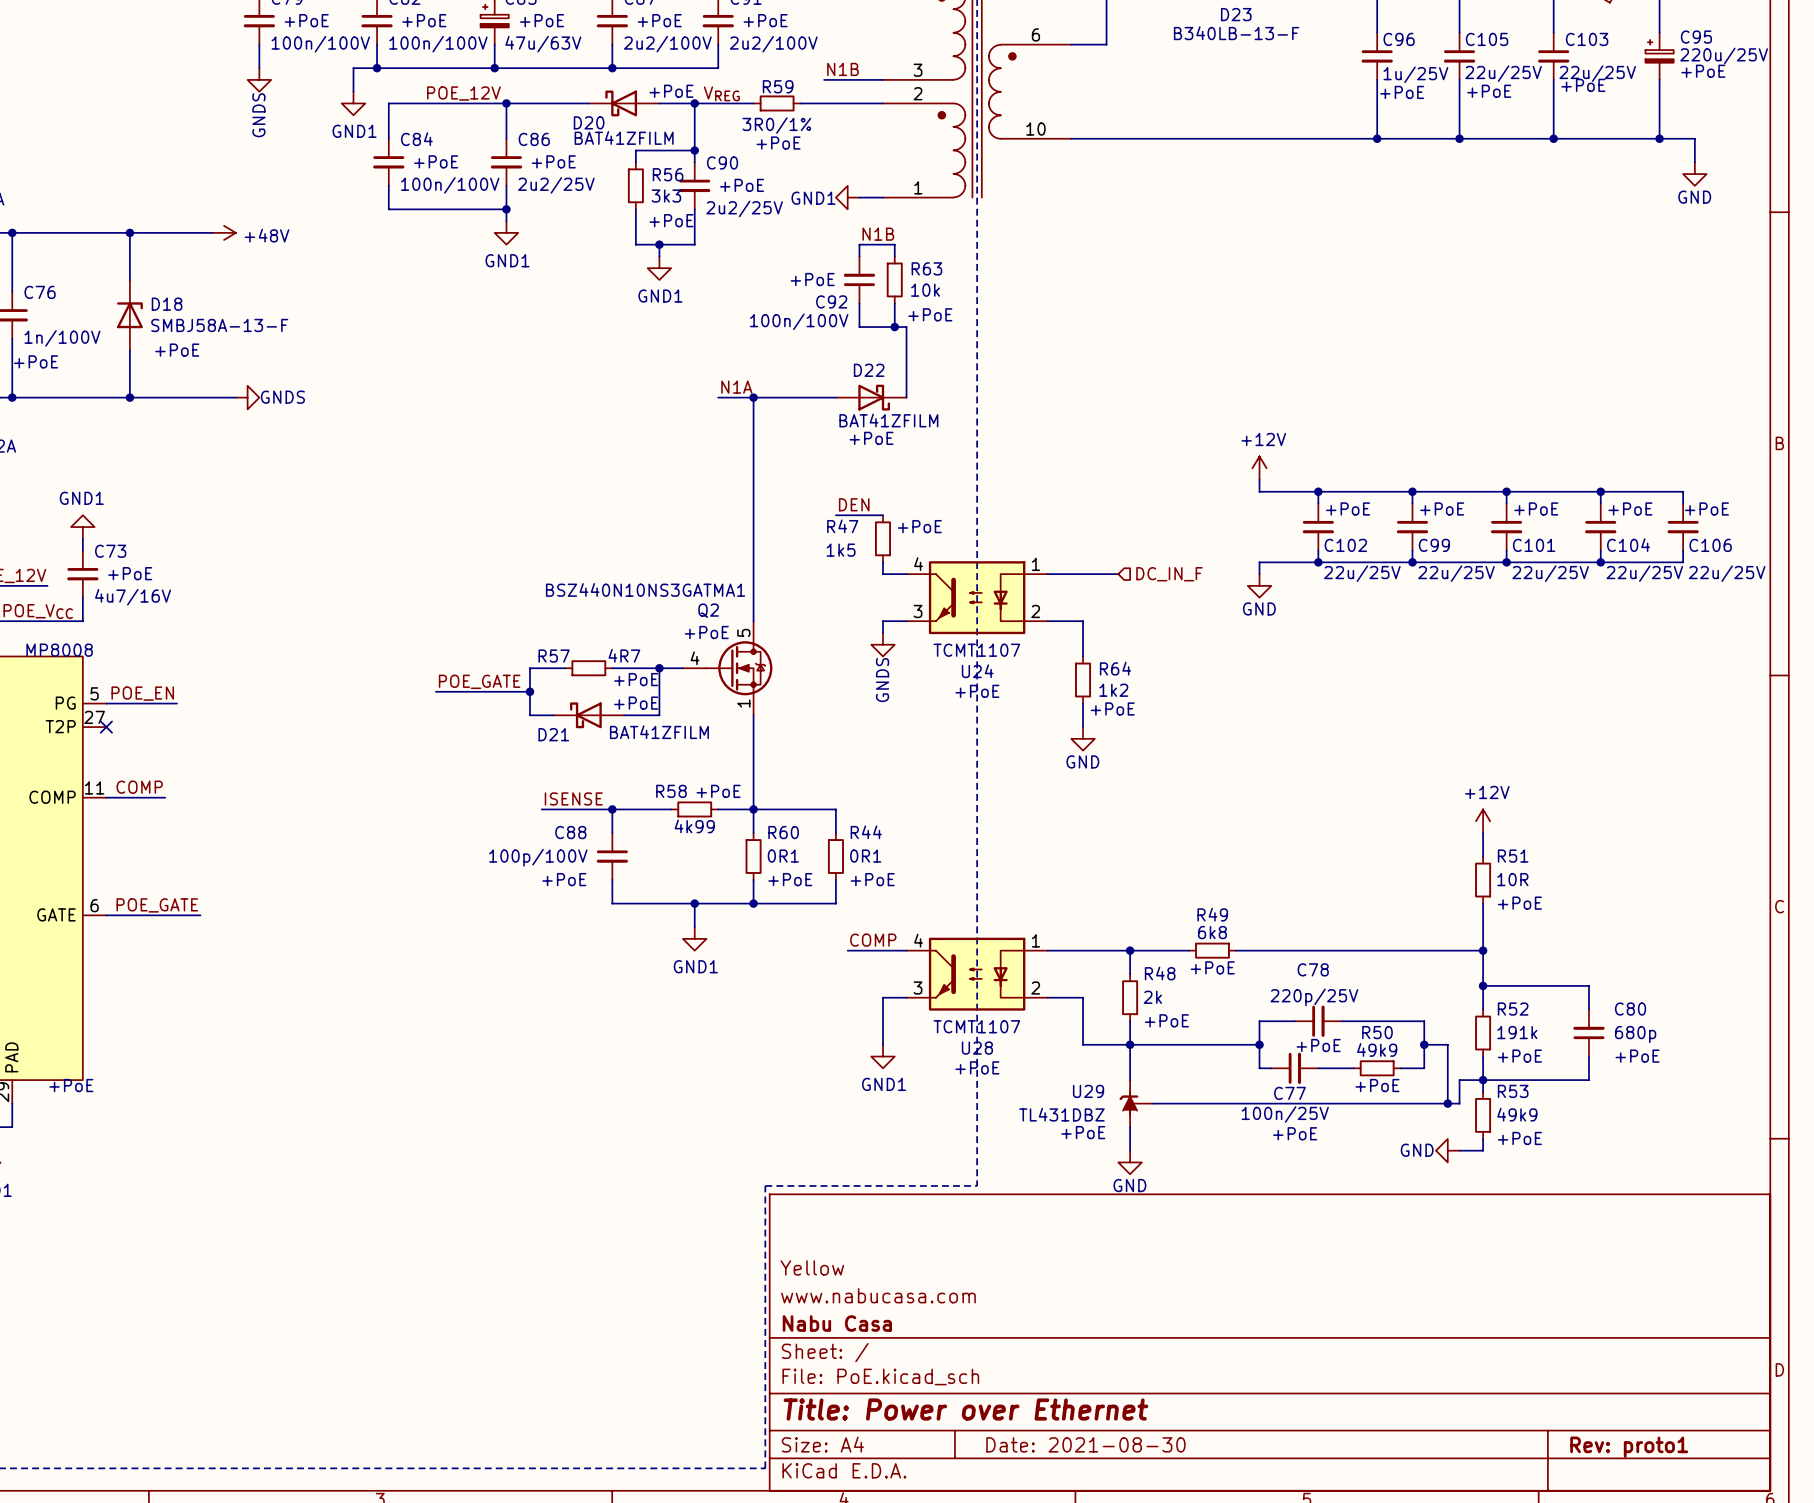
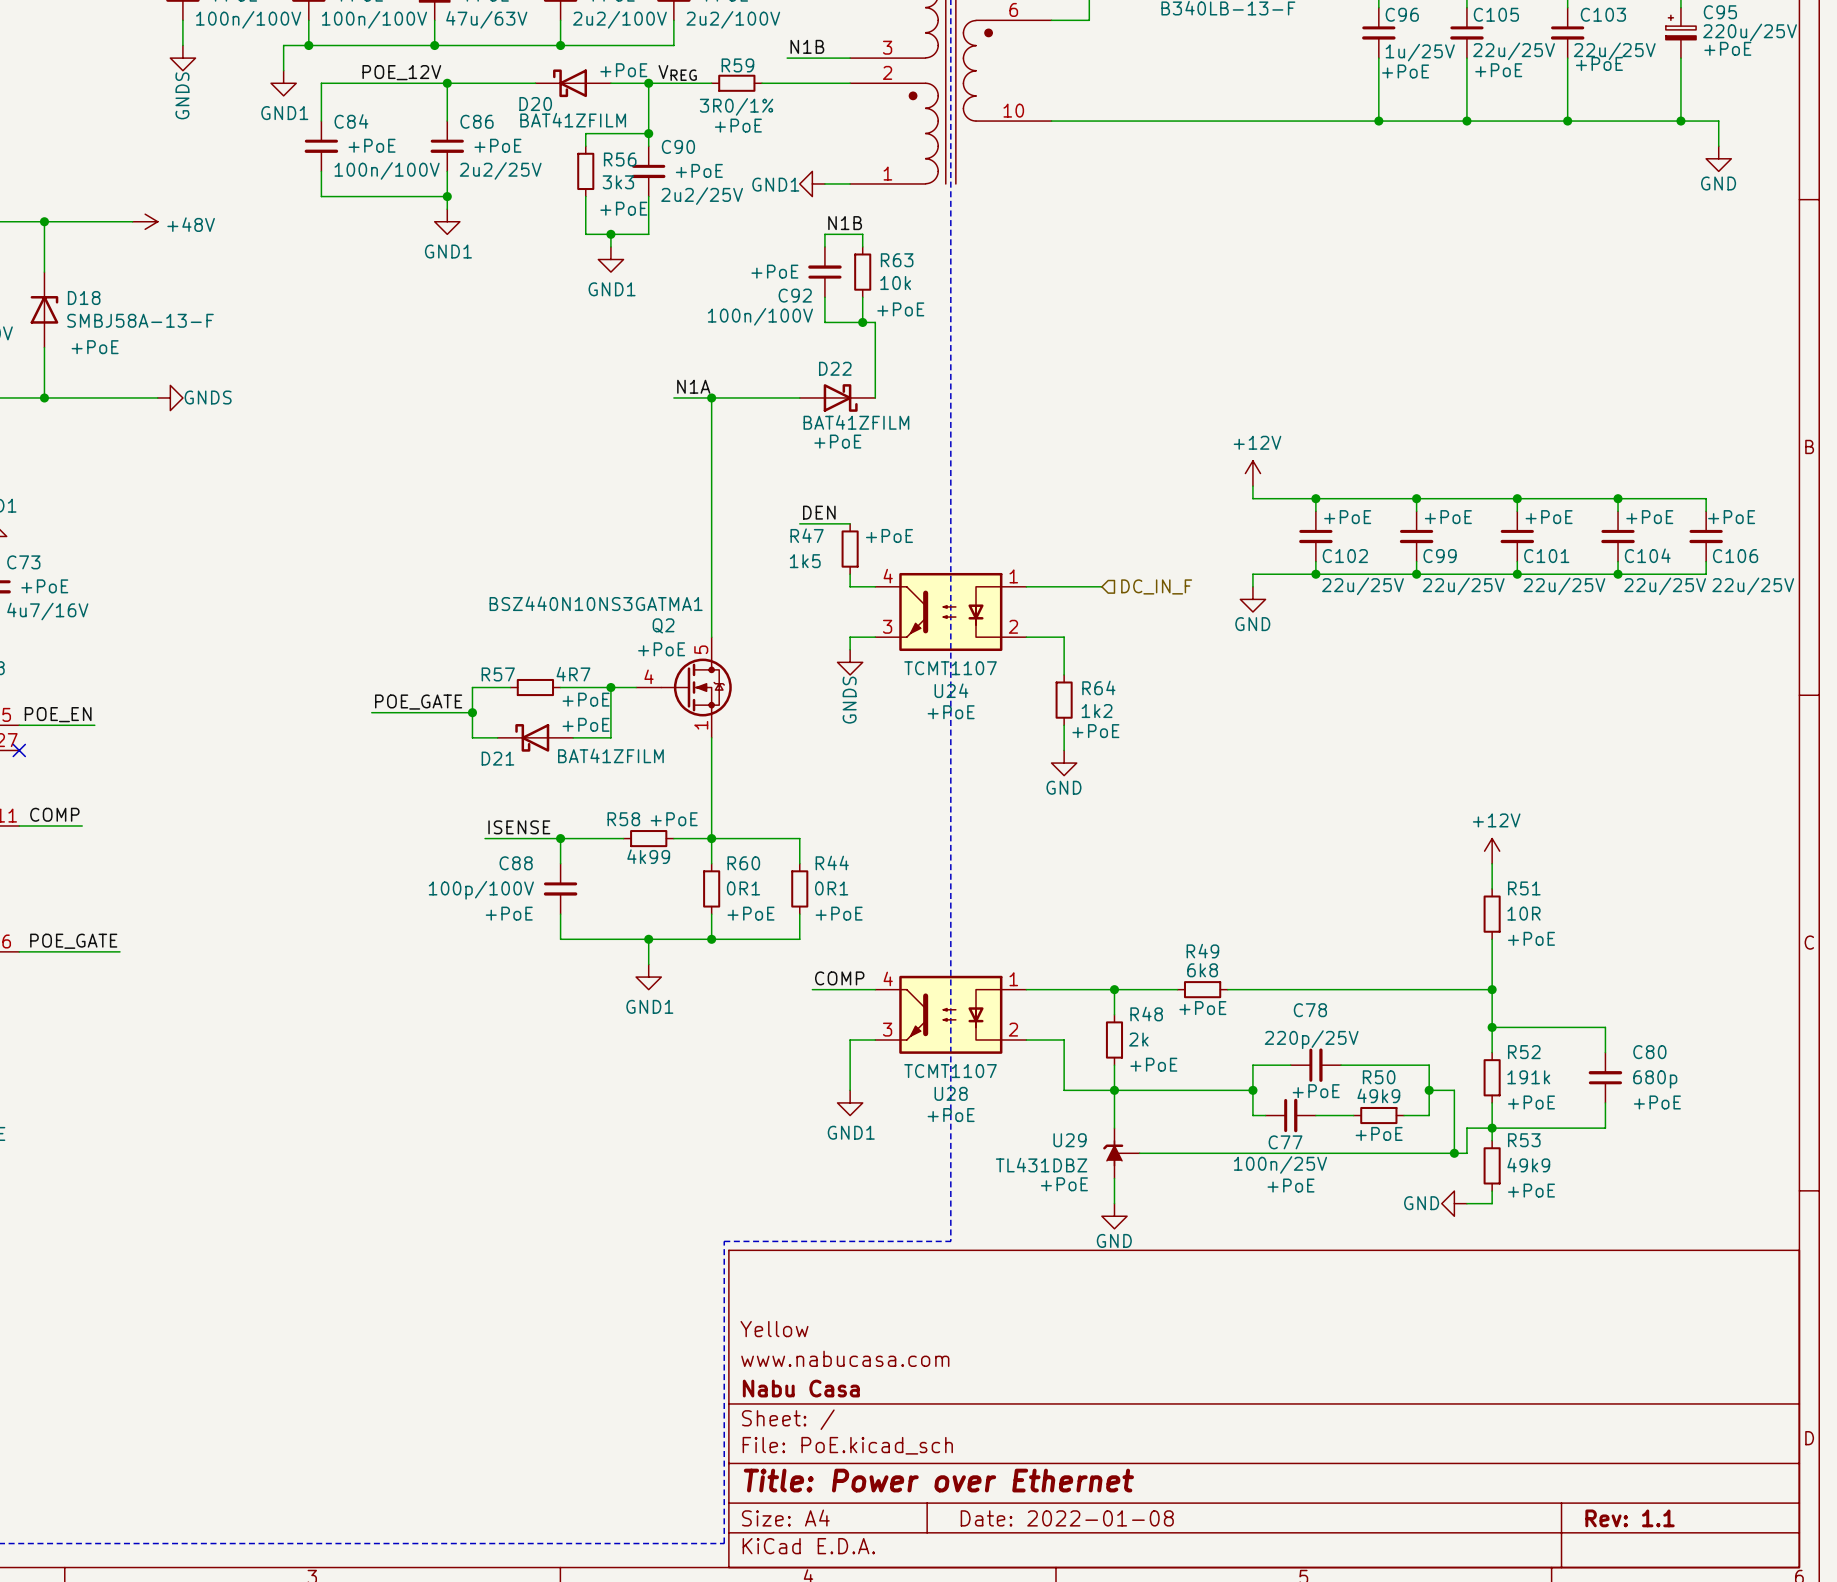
title block: Date: 2021-08-30 (1085, 1444) -> Date: 2022-01-08 (1067, 1518)
title block: Rev: proto1 (1629, 1447) -> Rev: 1.1 (1630, 1518)

